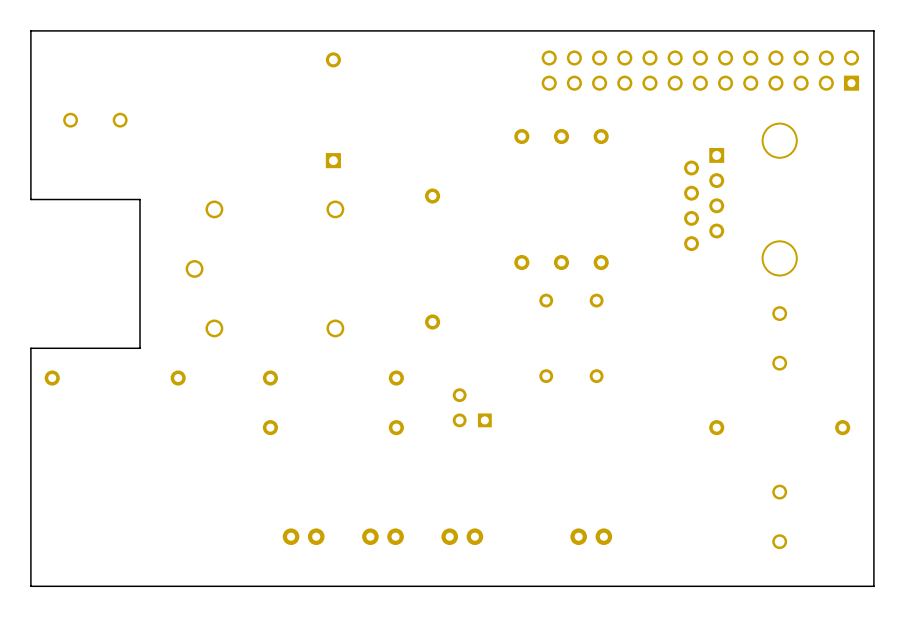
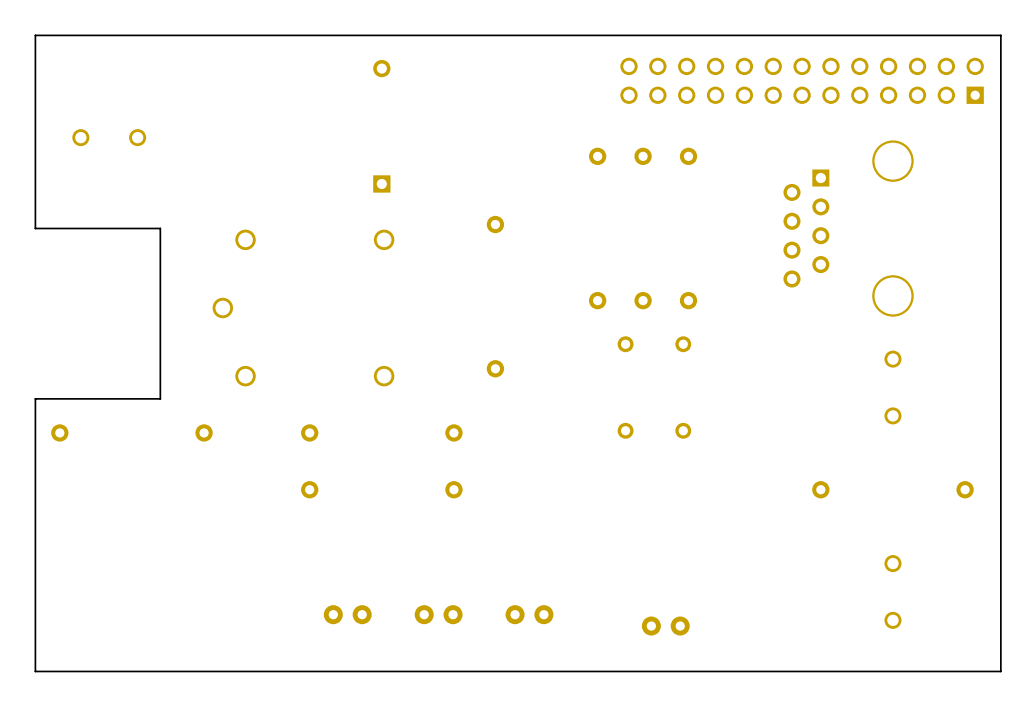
part: (472, 407) -> none
part position: (591, 536) -> (665, 626)

